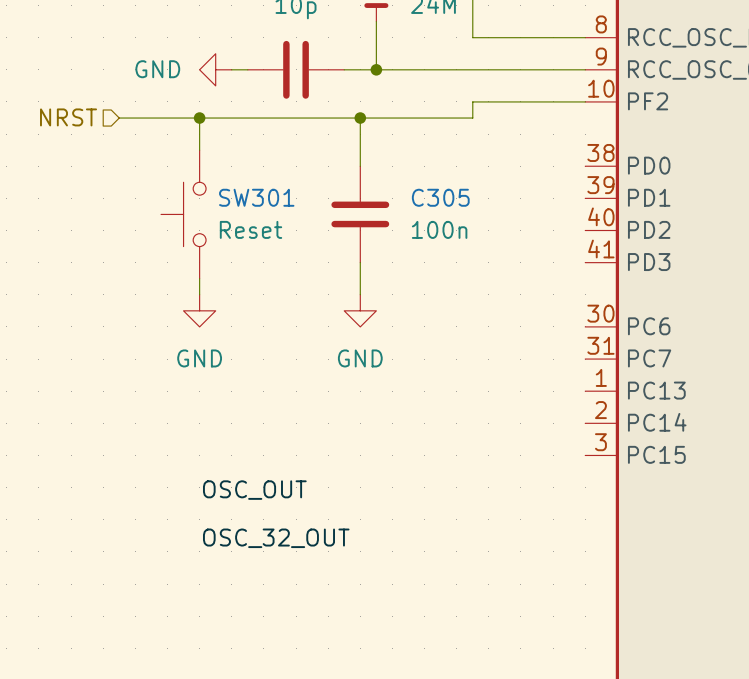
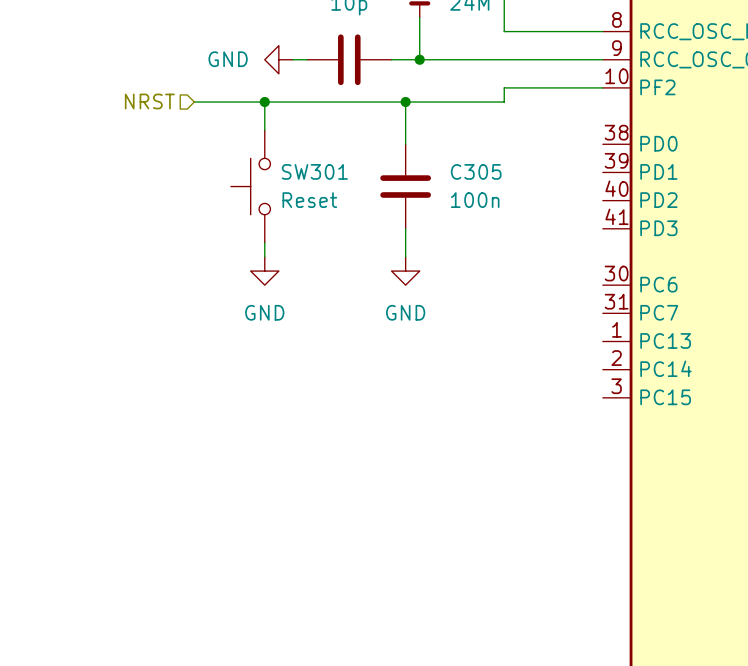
label: OSC_OUT (254, 490) -> none
label: OSC_32_OUT (276, 538) -> none

